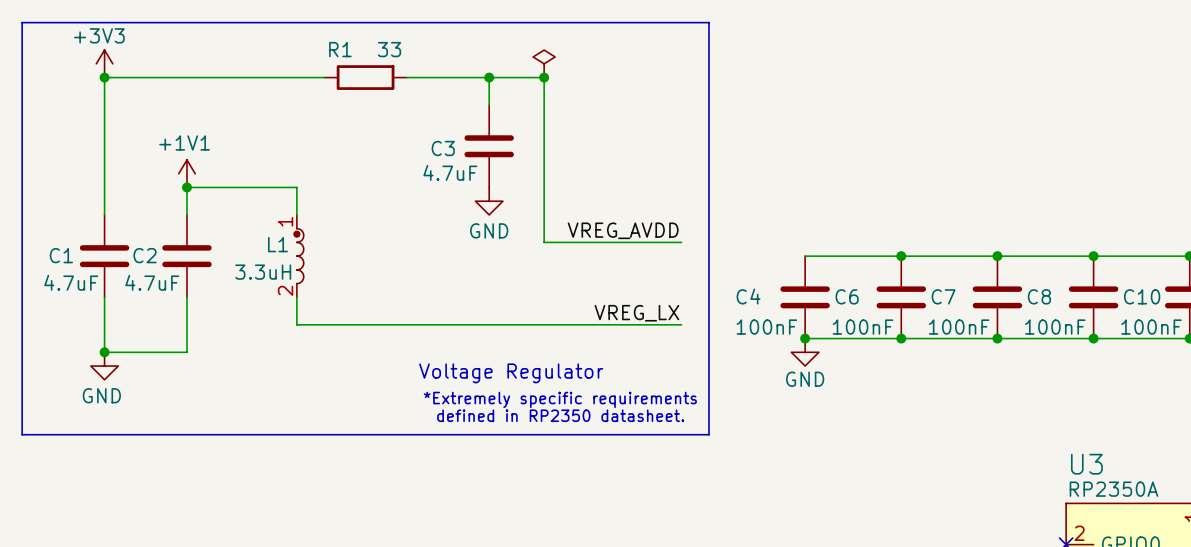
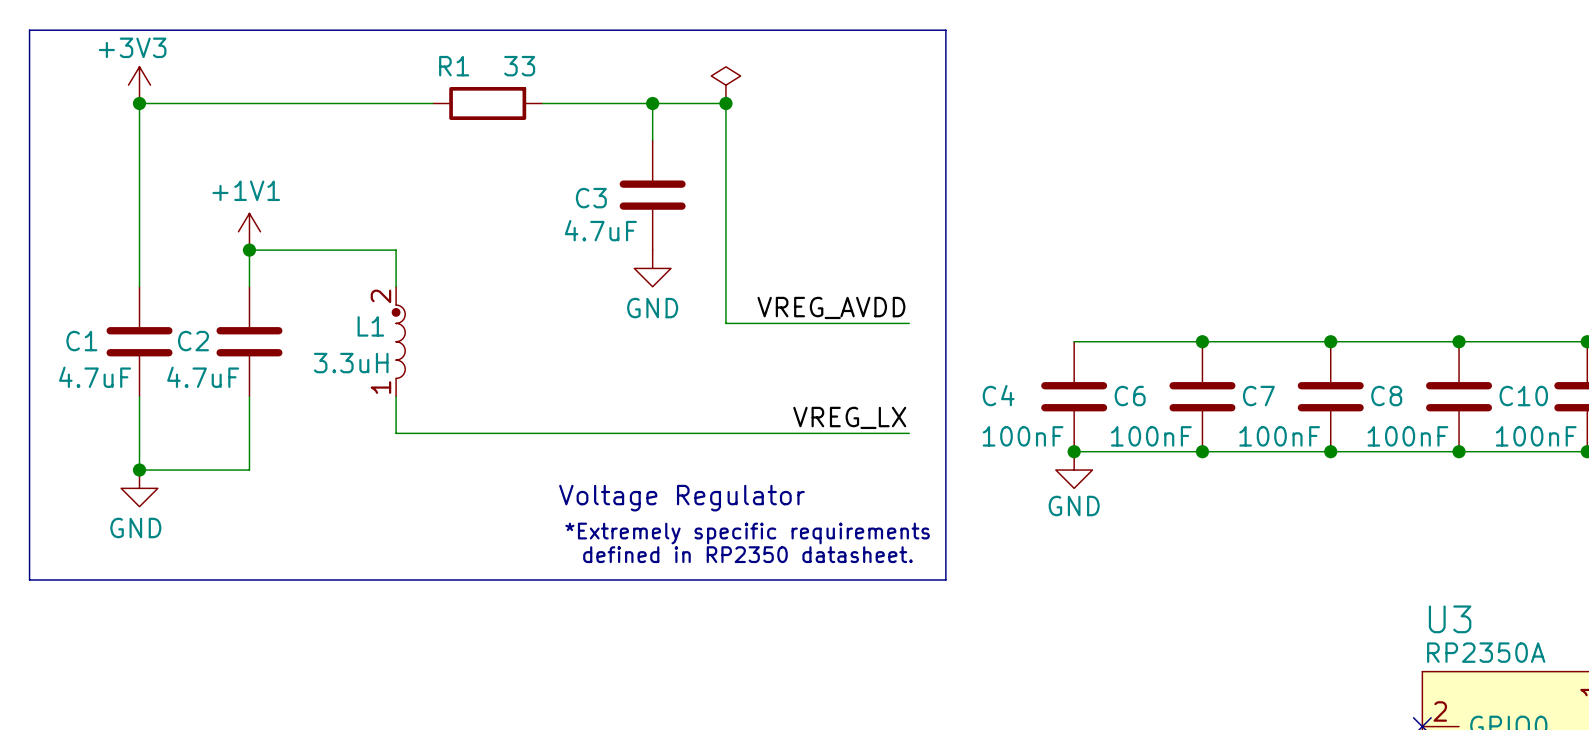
L1 pin number: 1 (285, 221) -> 2 (380, 296)
L1 pin number: 2 (285, 290) -> 1 (380, 387)

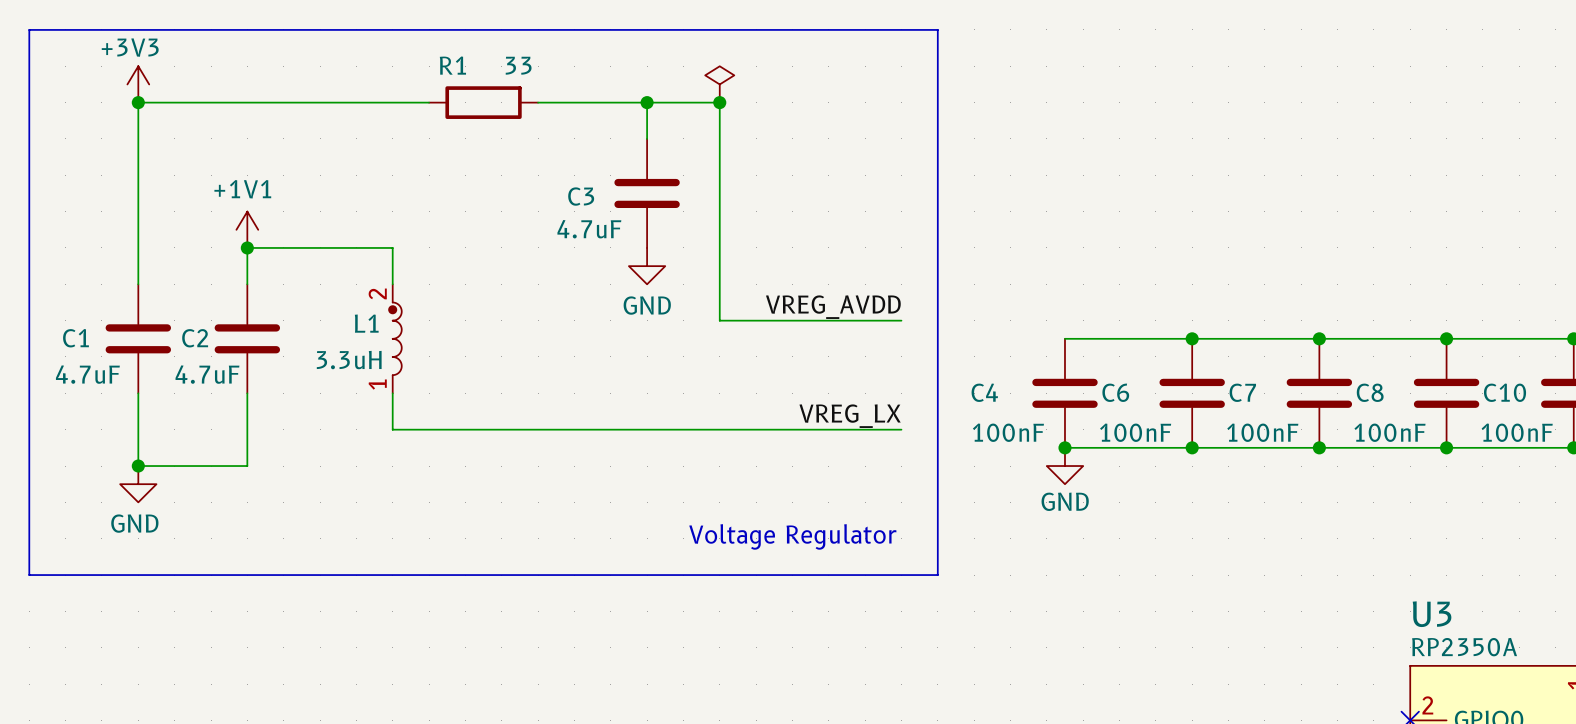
text position: Voltage Regulator (681, 498) -> Voltage Regulator (792, 536)
text: *Extremely specific requirements (747, 533) -> none
text: defined in RP2350 datasheet. (747, 554) -> none

